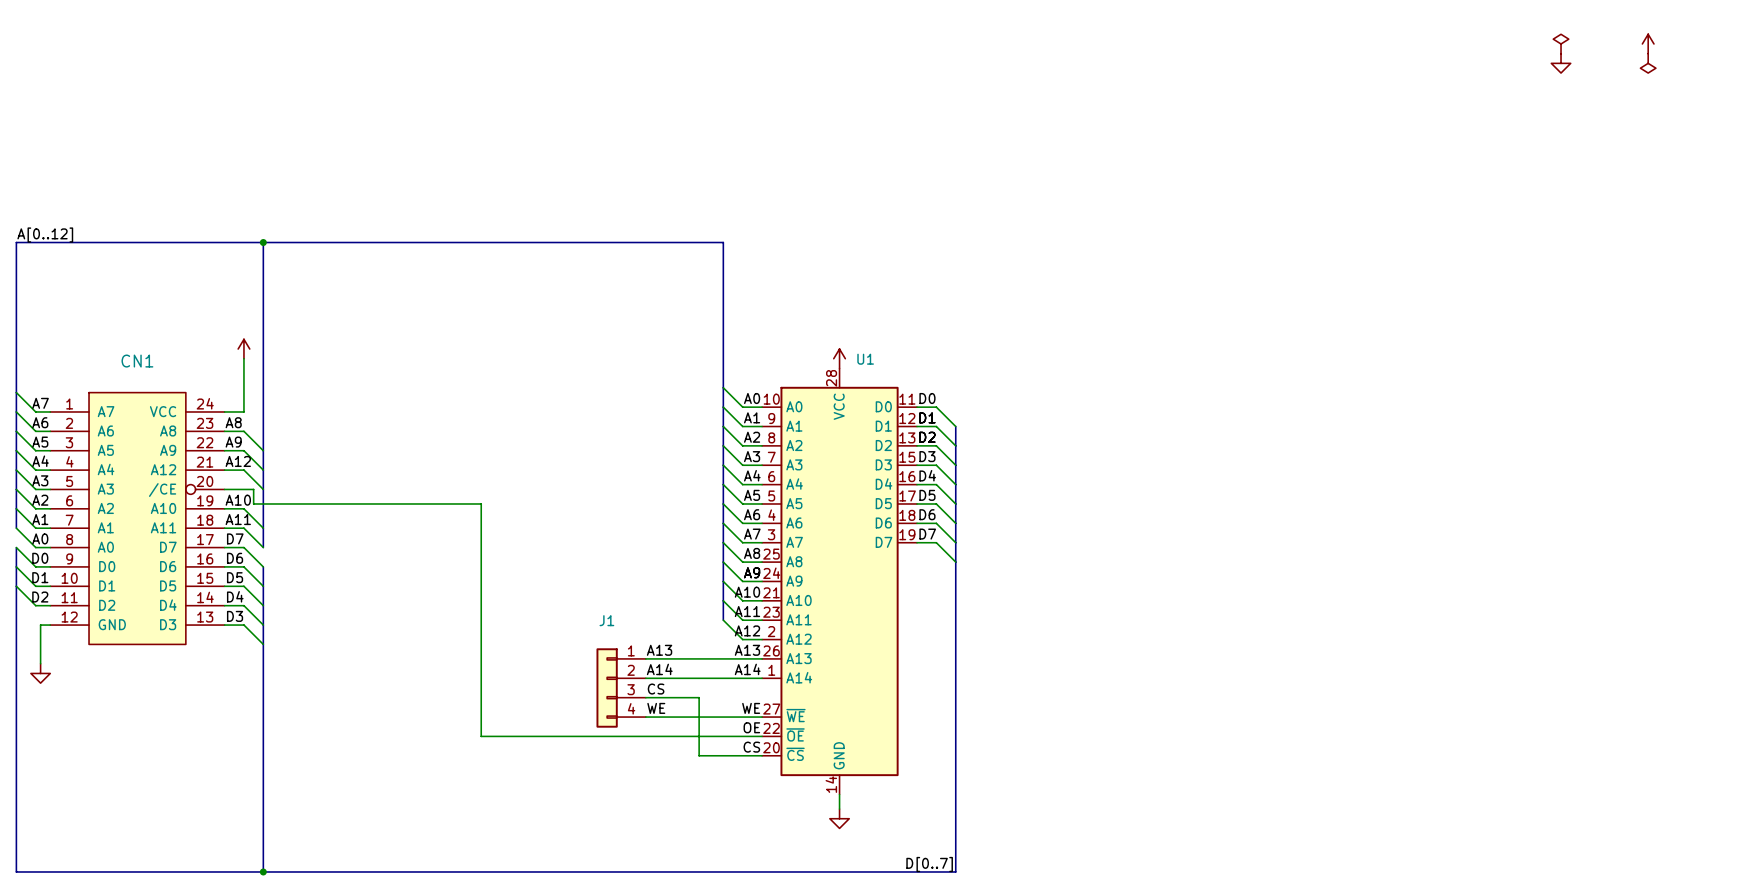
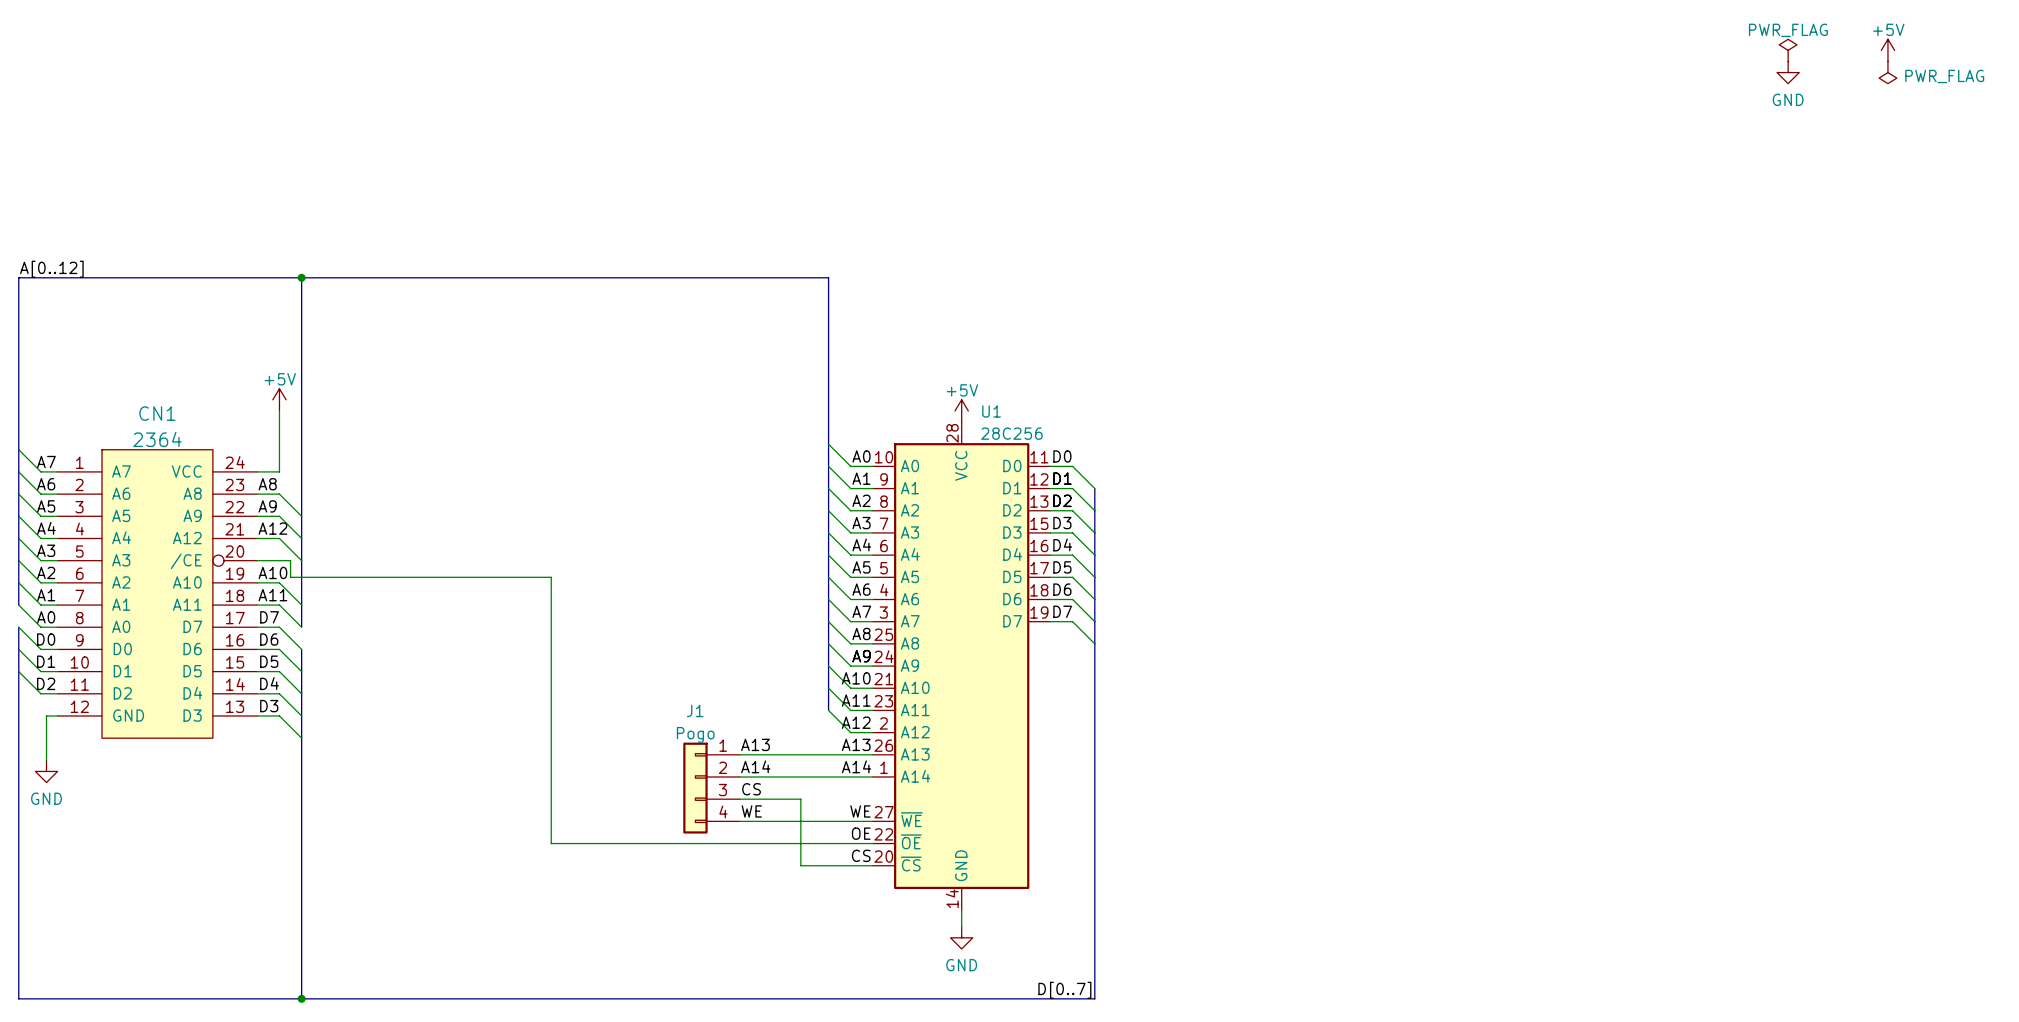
power symbol text: none -> PWR_FLAG (1788, 30)
power symbol text: none -> +5V (1888, 29)
power symbol text: none -> PWR_FLAG (1944, 76)
power symbol text: none -> GND (1788, 99)
power symbol text: none -> +5V (280, 379)
power symbol text: none -> +5V (962, 390)
U1 value: none -> 28C256 (1011, 433)
CN1 value: none -> 2364 (157, 439)
J1 value: none -> Pogo (695, 734)
power symbol text: none -> GND (46, 798)
power symbol text: none -> GND (961, 965)

